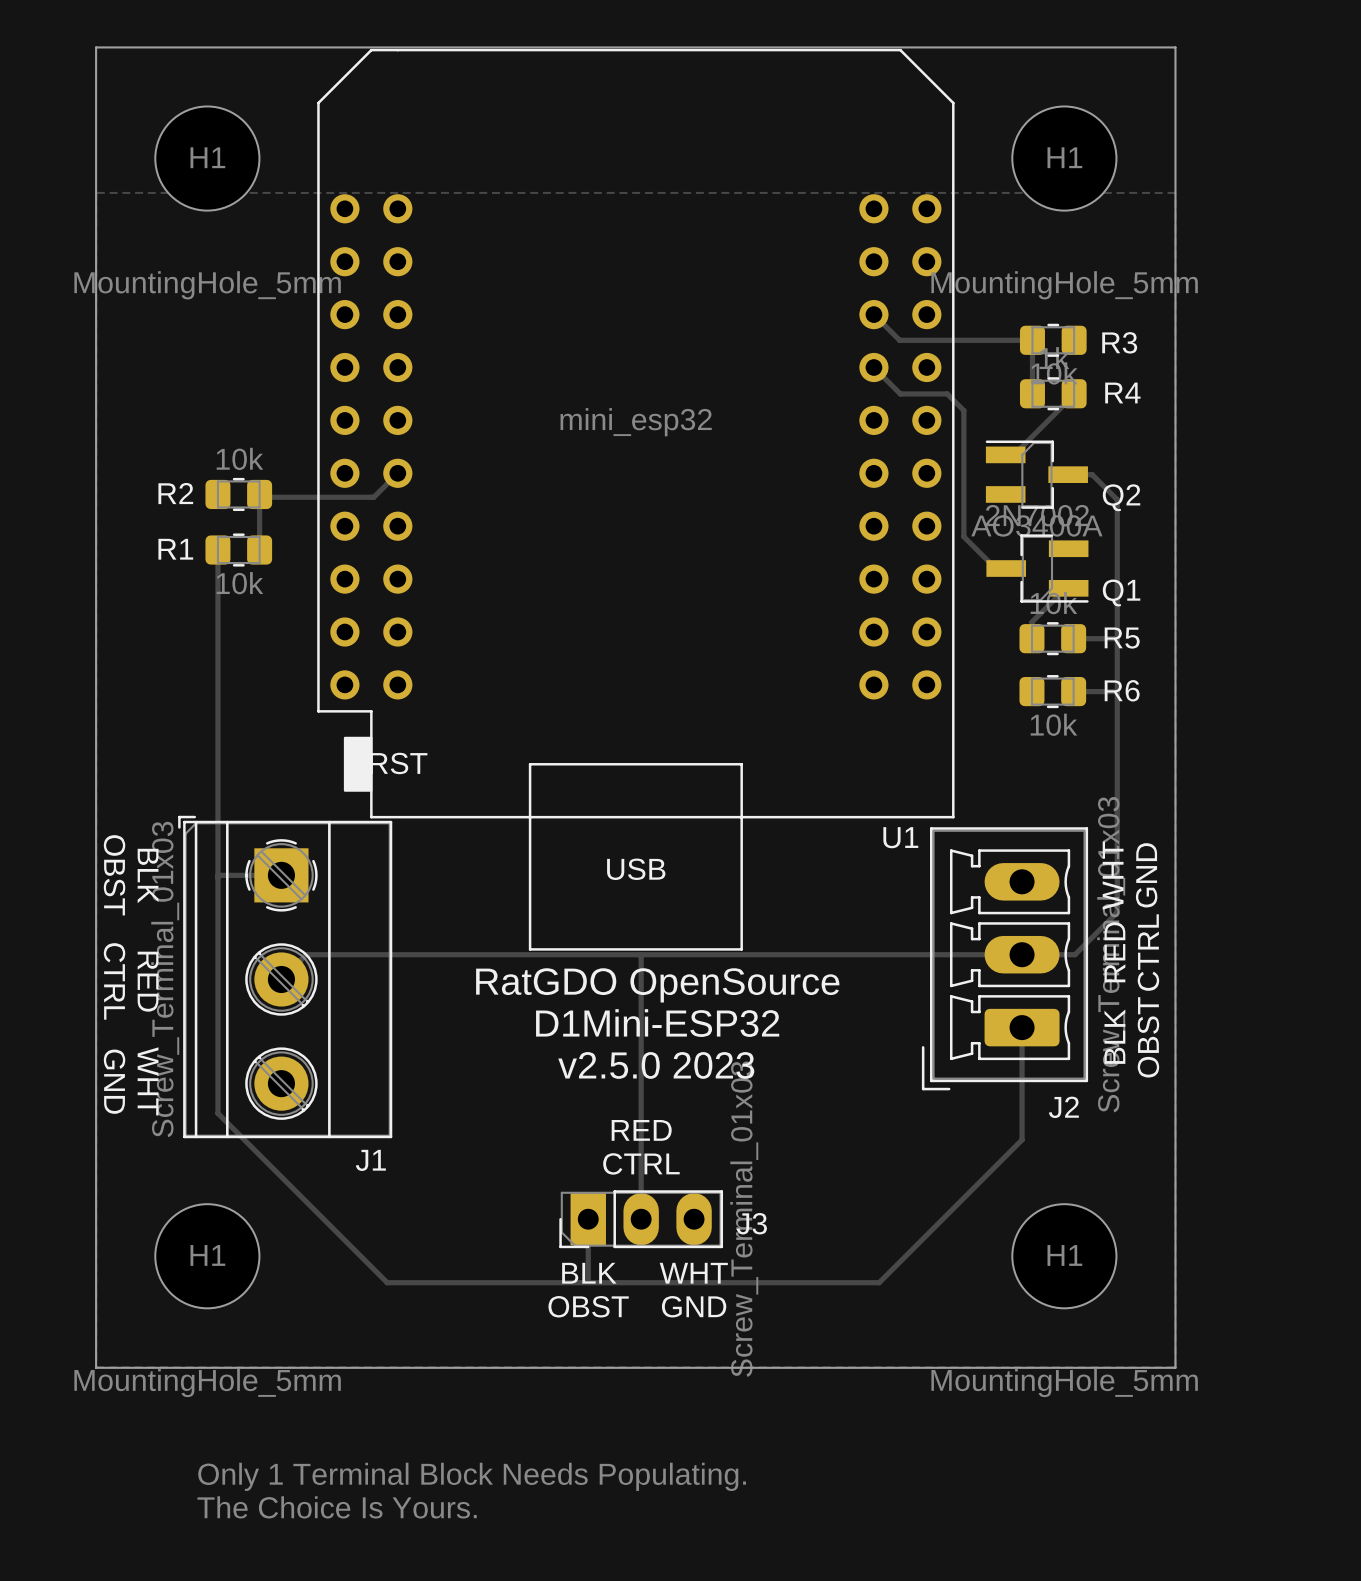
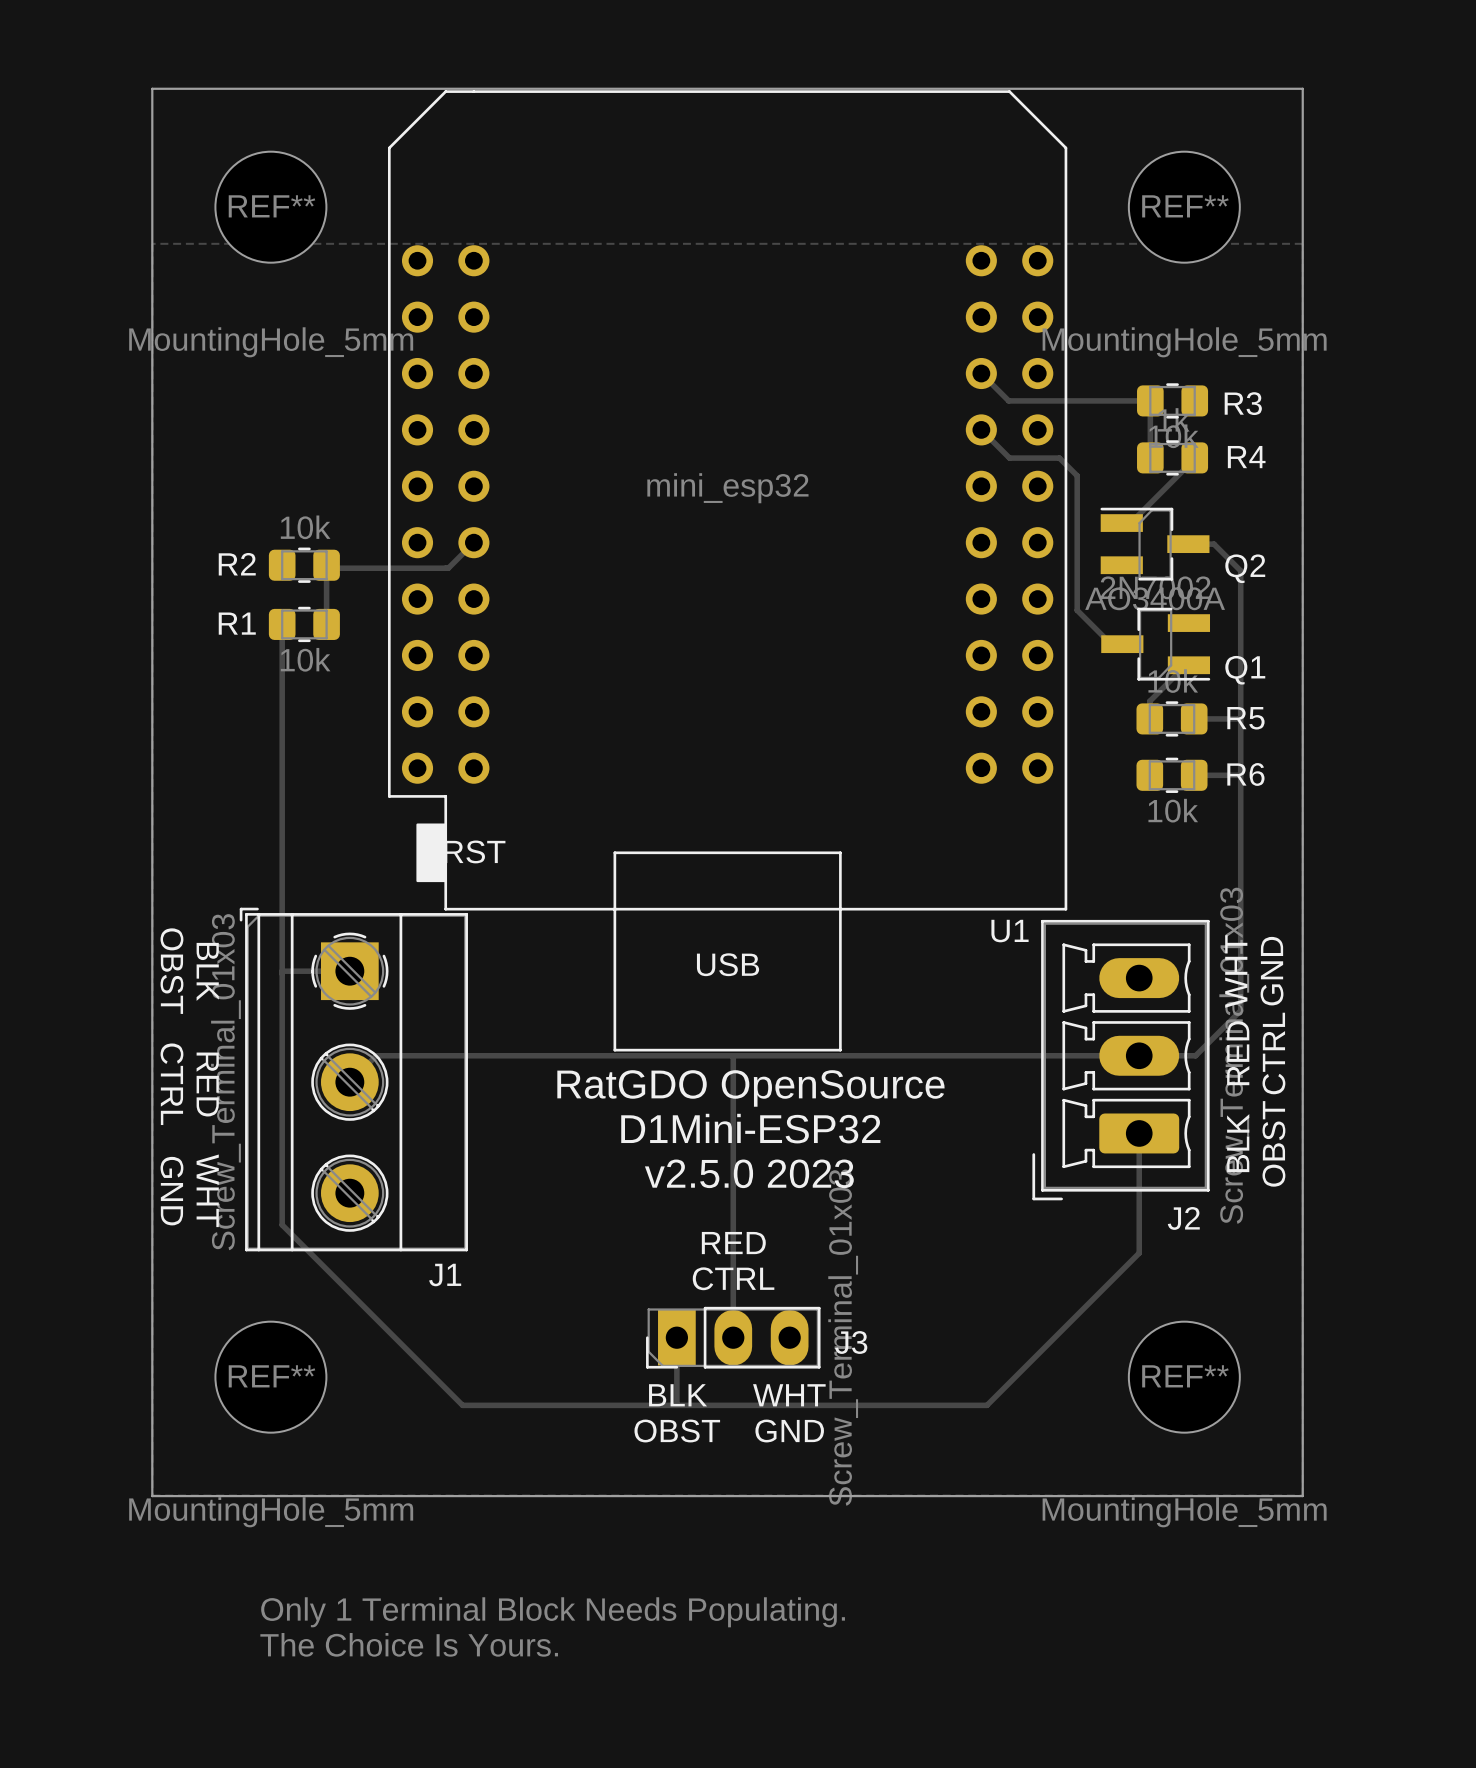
H1 name: H1 (207, 157) -> REF** (271, 206)
H1 name: H1 (1064, 157) -> REF** (1185, 206)
H1 name: H1 (207, 1255) -> REF** (271, 1376)
H1 name: H1 (1064, 1255) -> REF** (1185, 1376)

